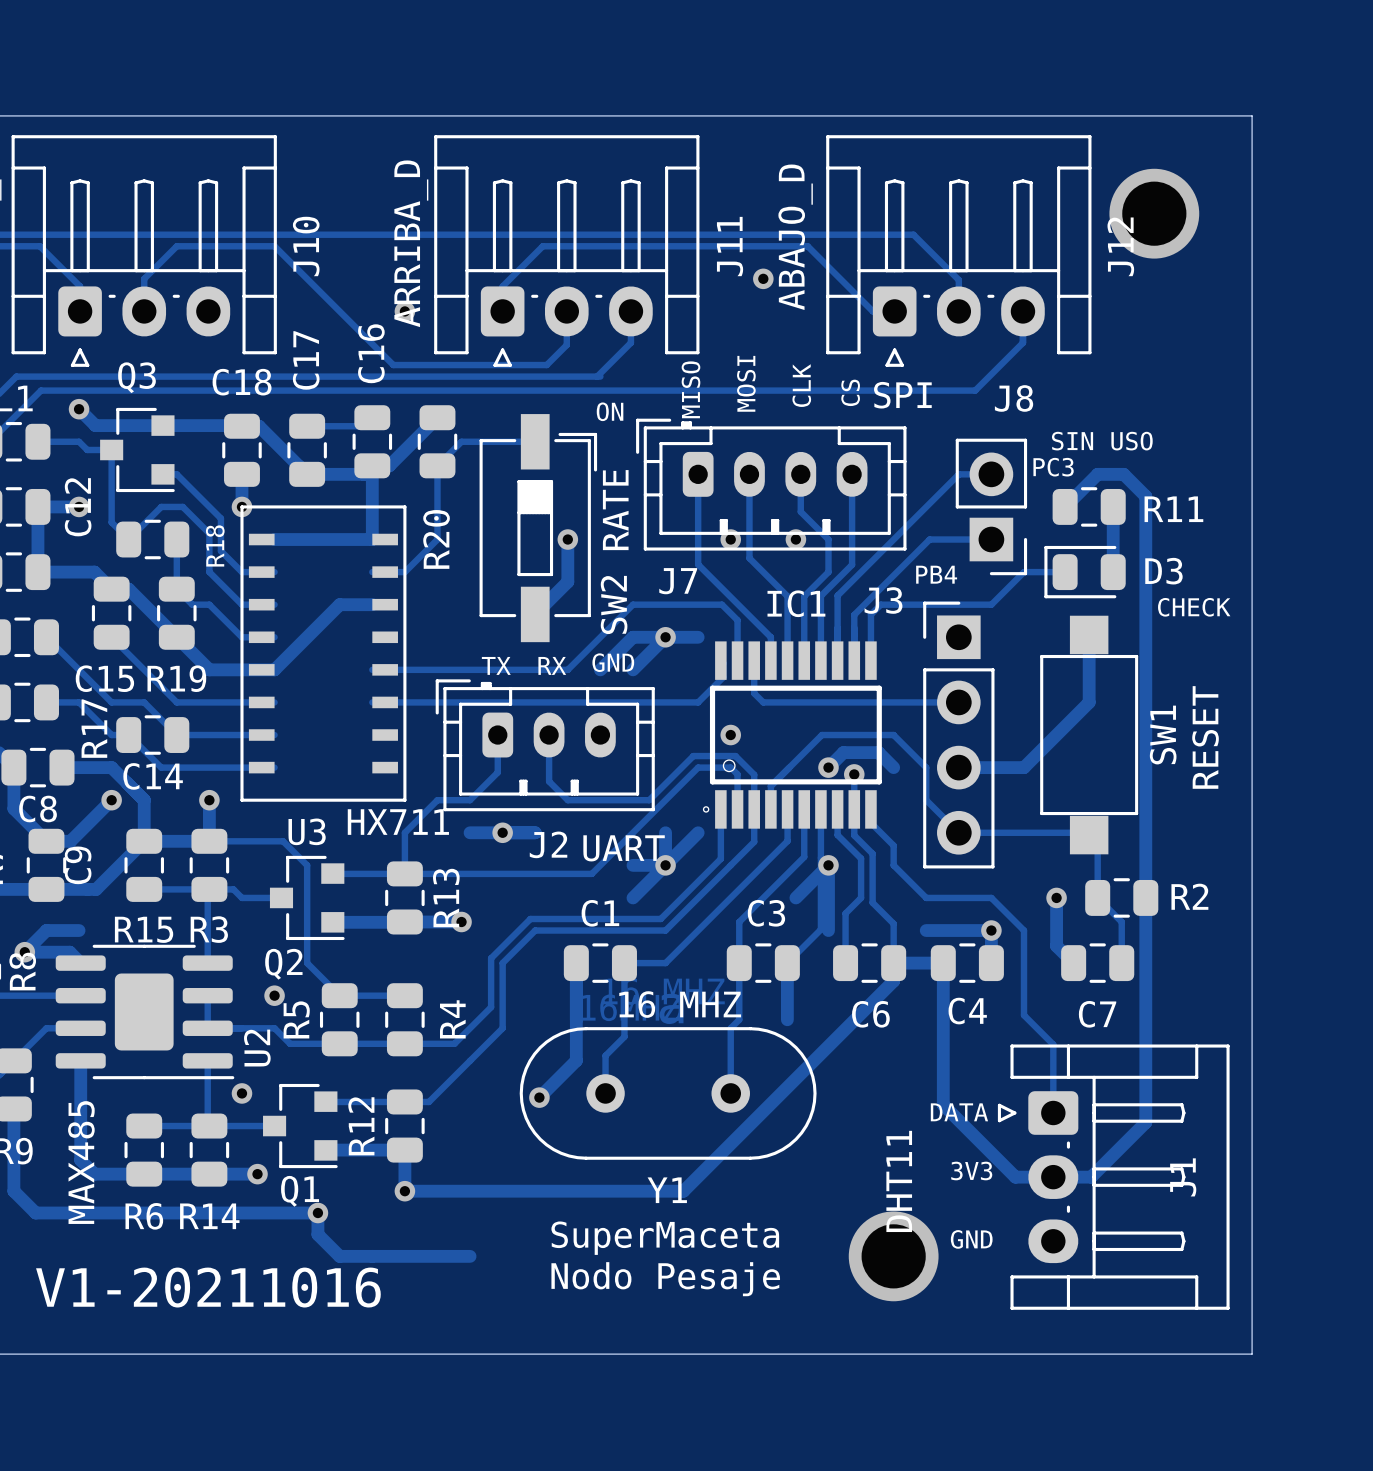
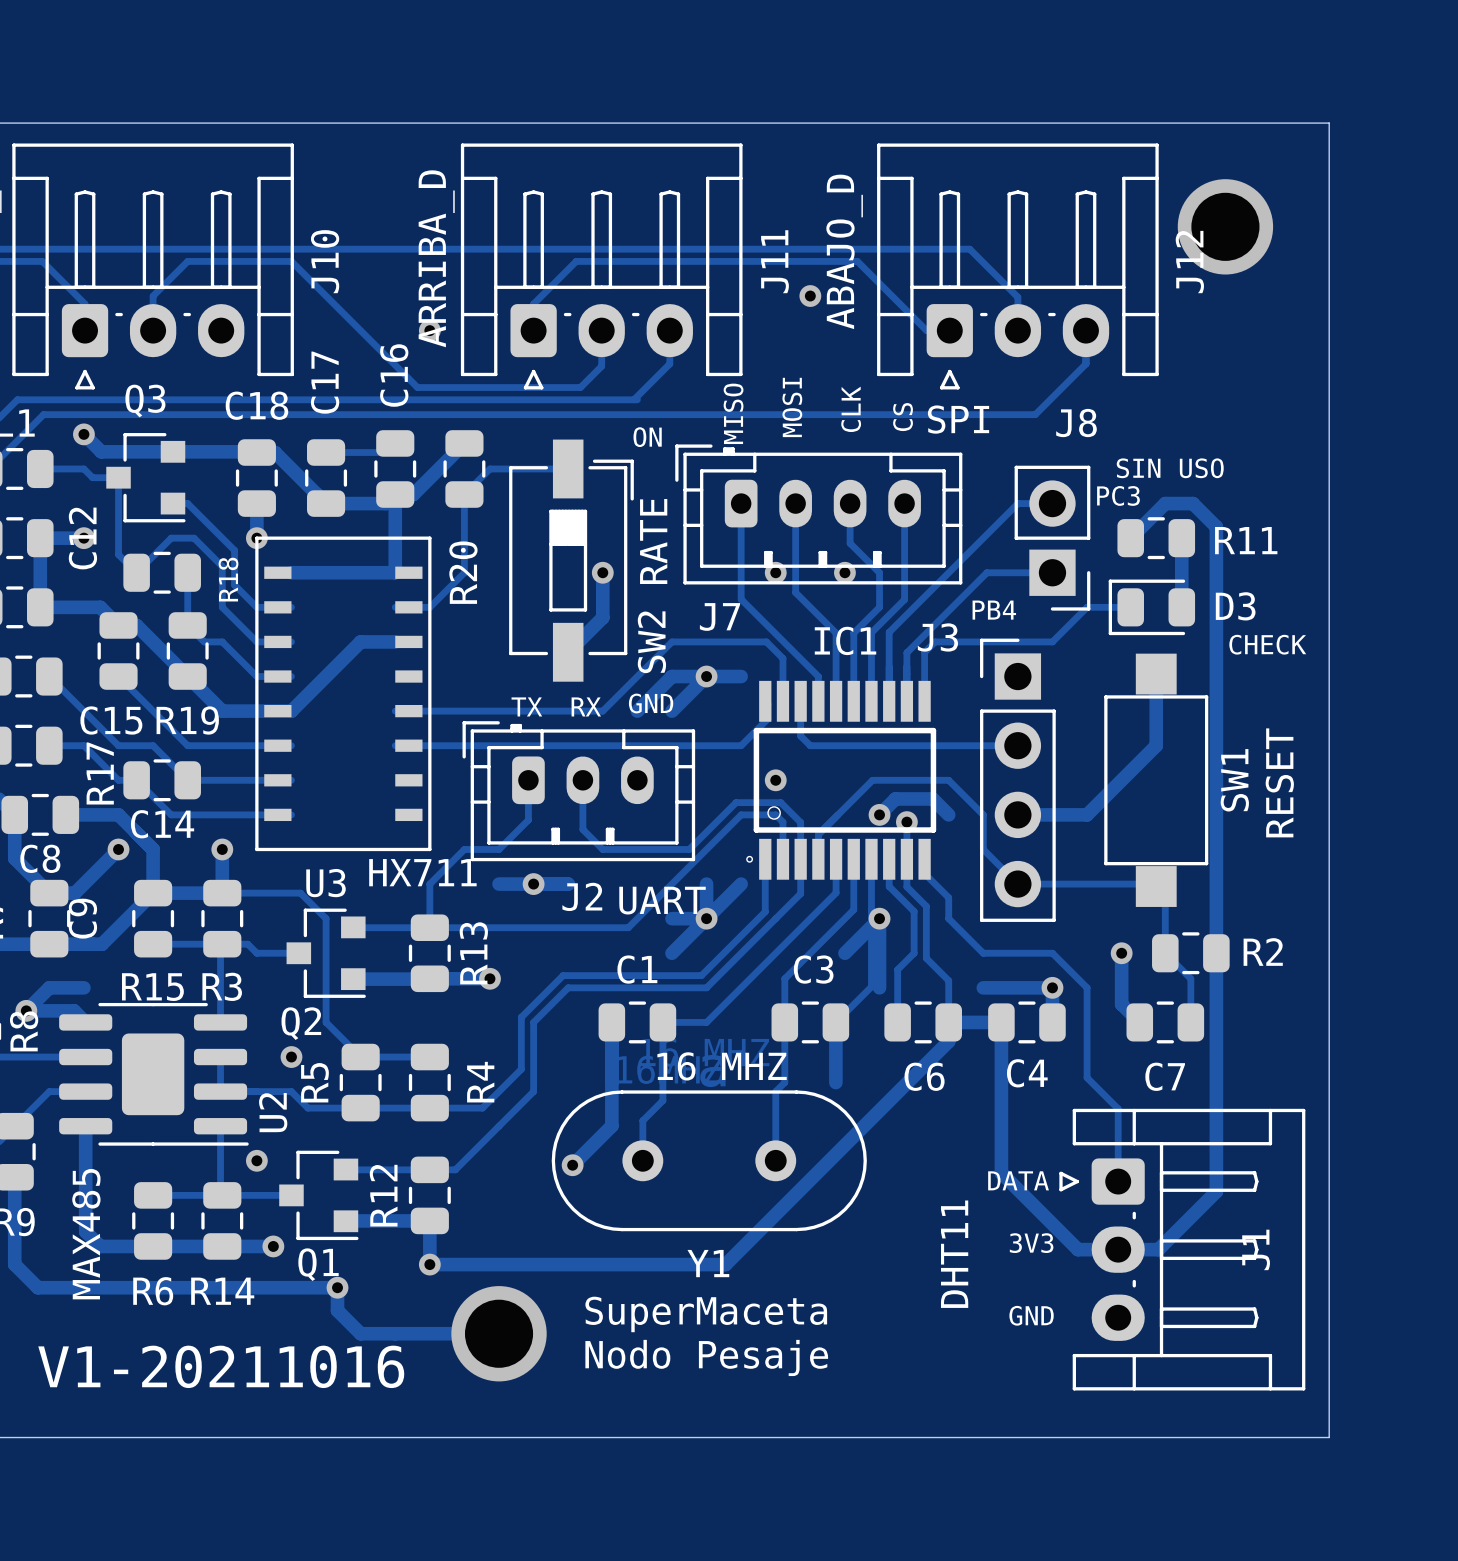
via: none -> (499, 1333)
via: (893, 1256) -> none

